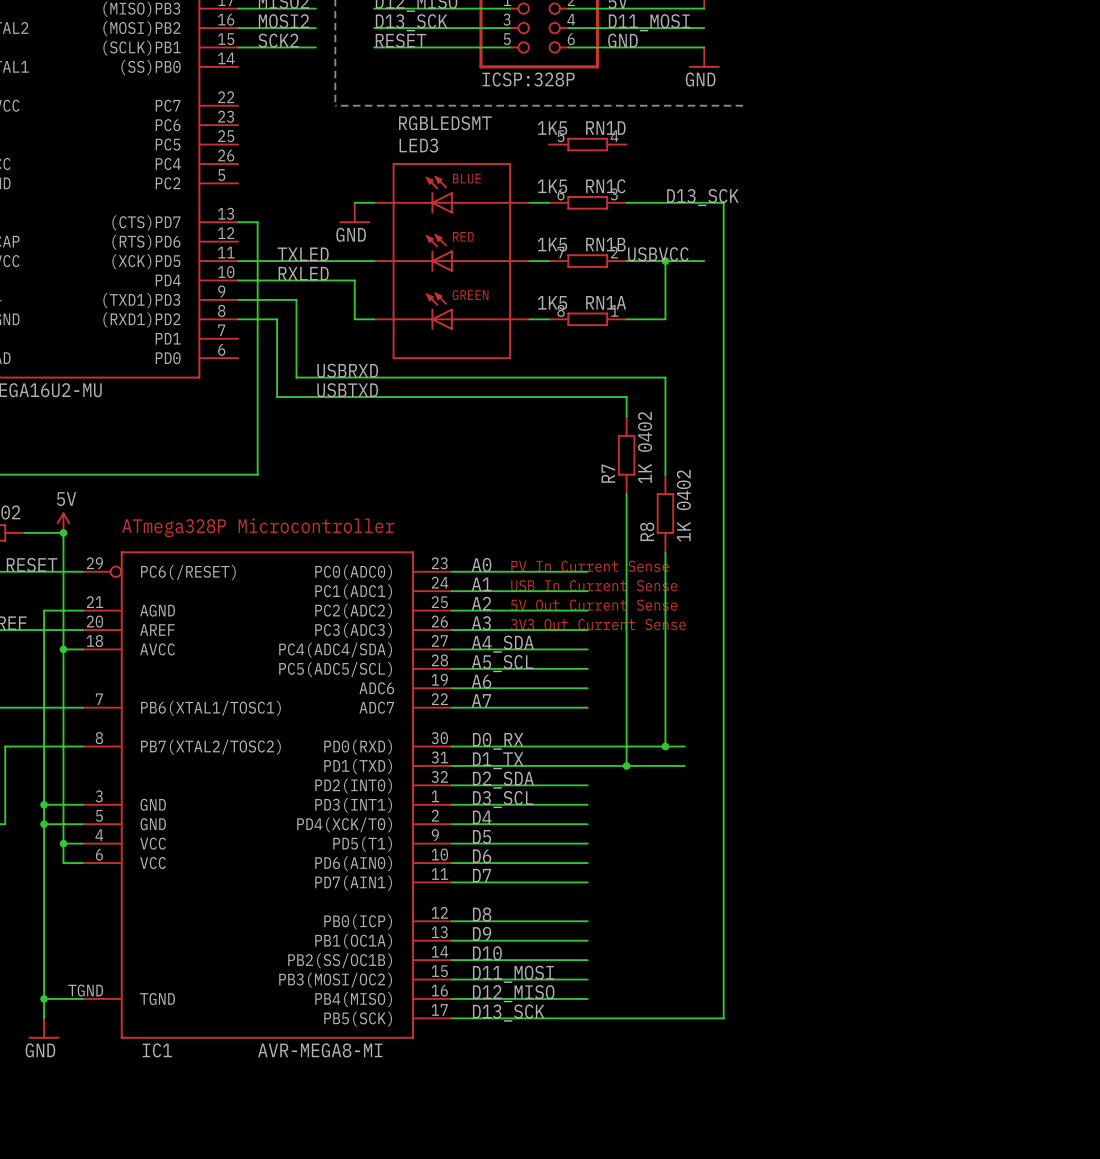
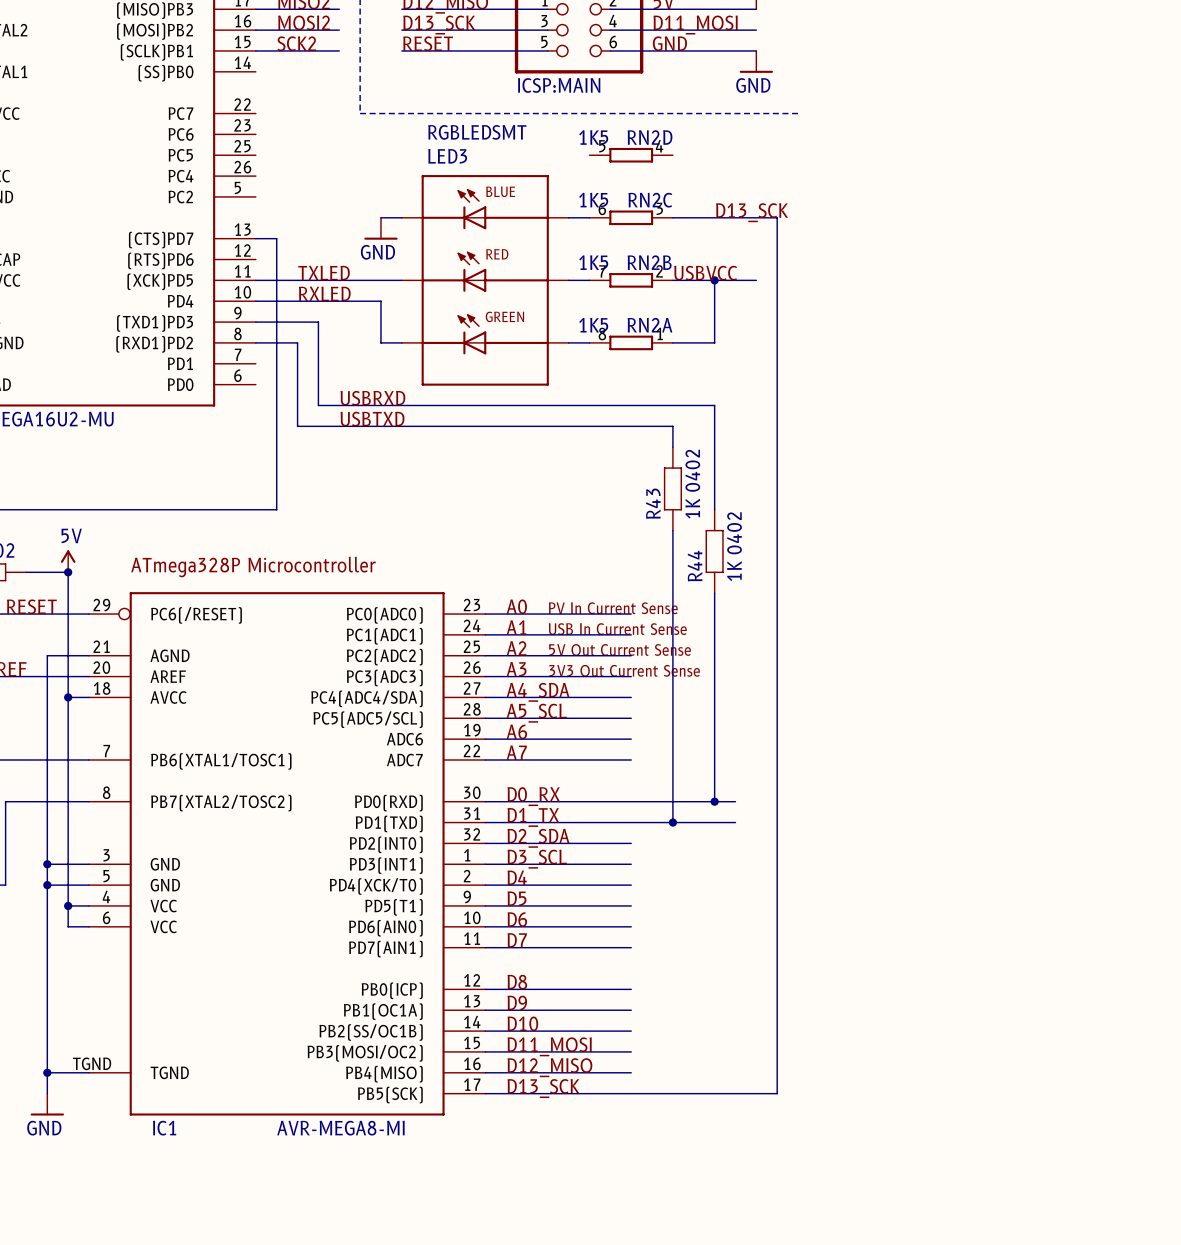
part value: ICSP:328P (528, 79) -> ICSP:MAIN (559, 85)
RN1D name: RN1D (605, 128) -> RN2D (650, 137)
RN1C name: RN1C (605, 186) -> RN2C (650, 200)
RN1B name: RN1B (605, 244) -> RN2B (649, 262)
RN1A name: RN1A (606, 302) -> RN2A (649, 325)
R7 name: R7 (608, 473) -> R43 (653, 503)
R8 name: R8 (647, 531) -> R44 (695, 566)

